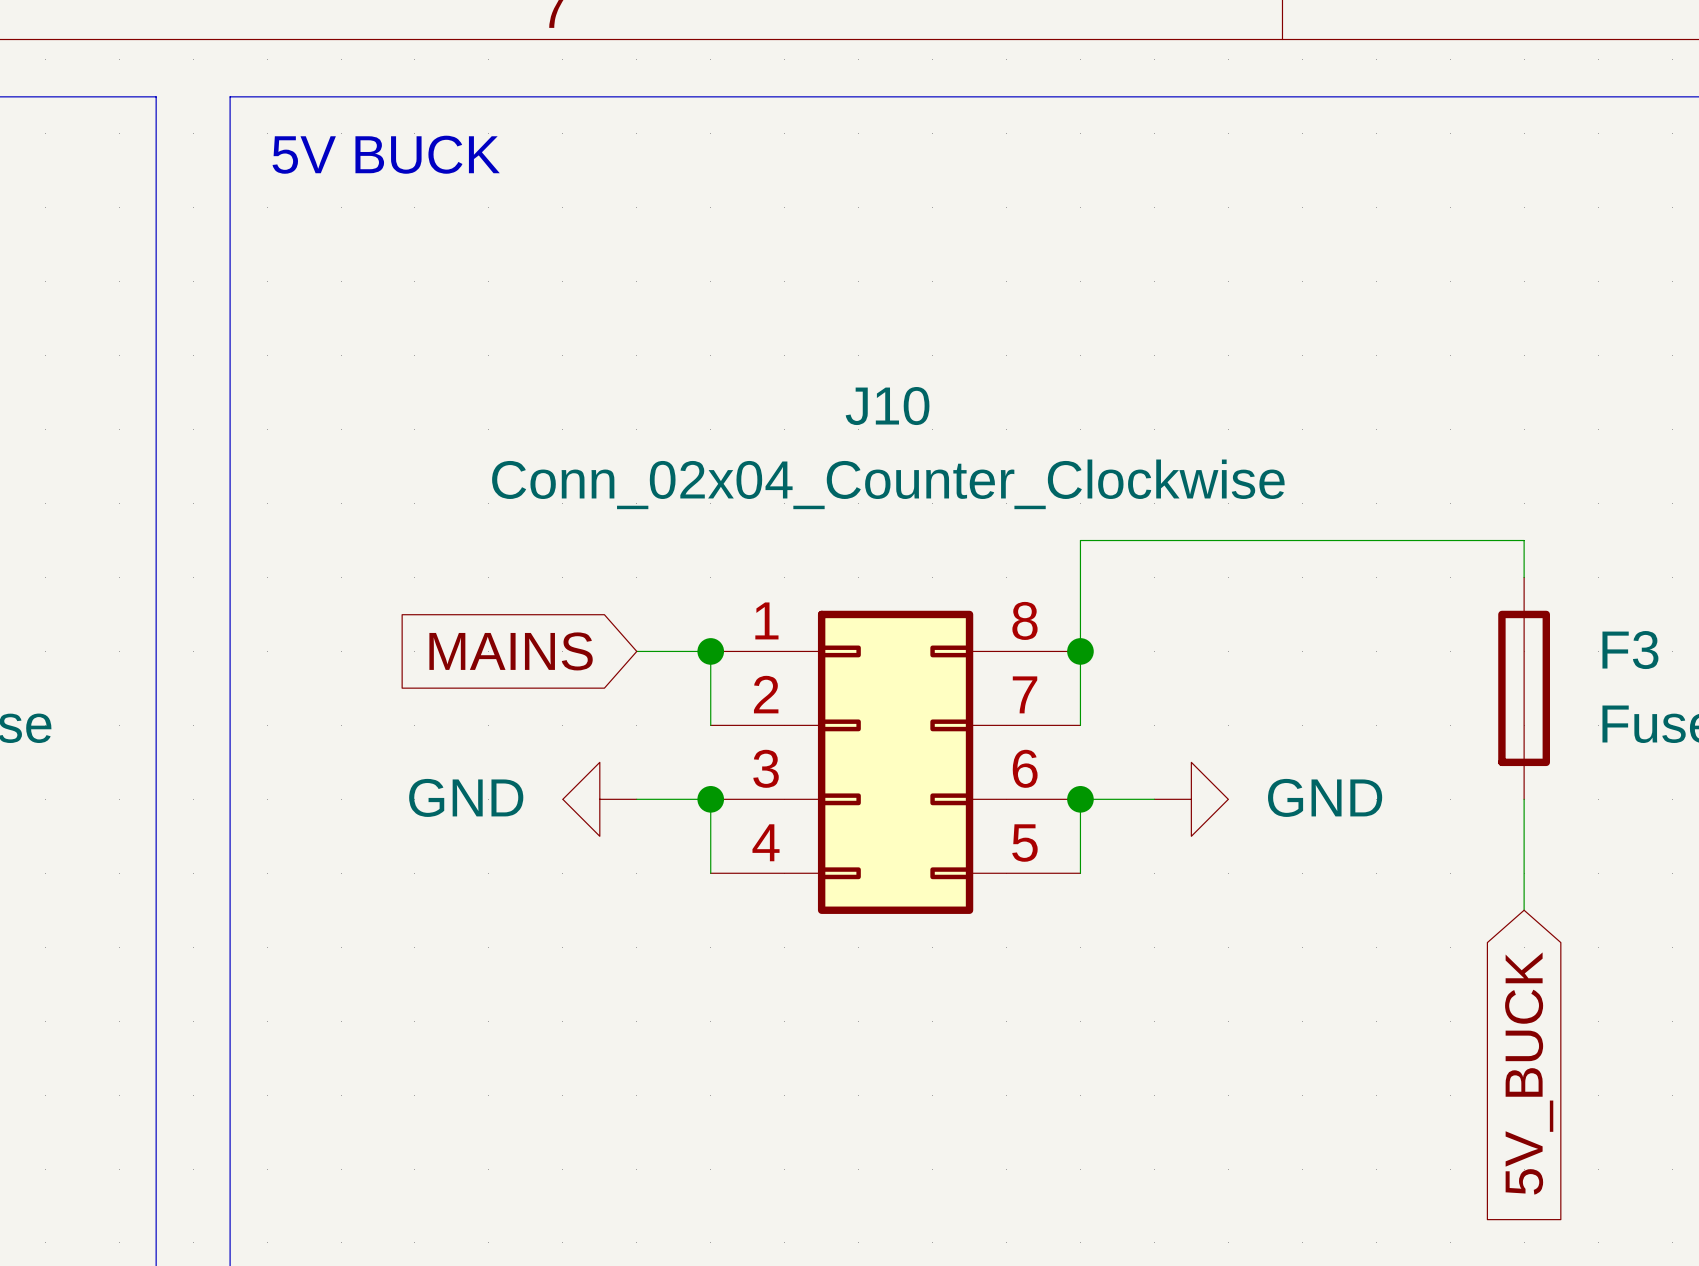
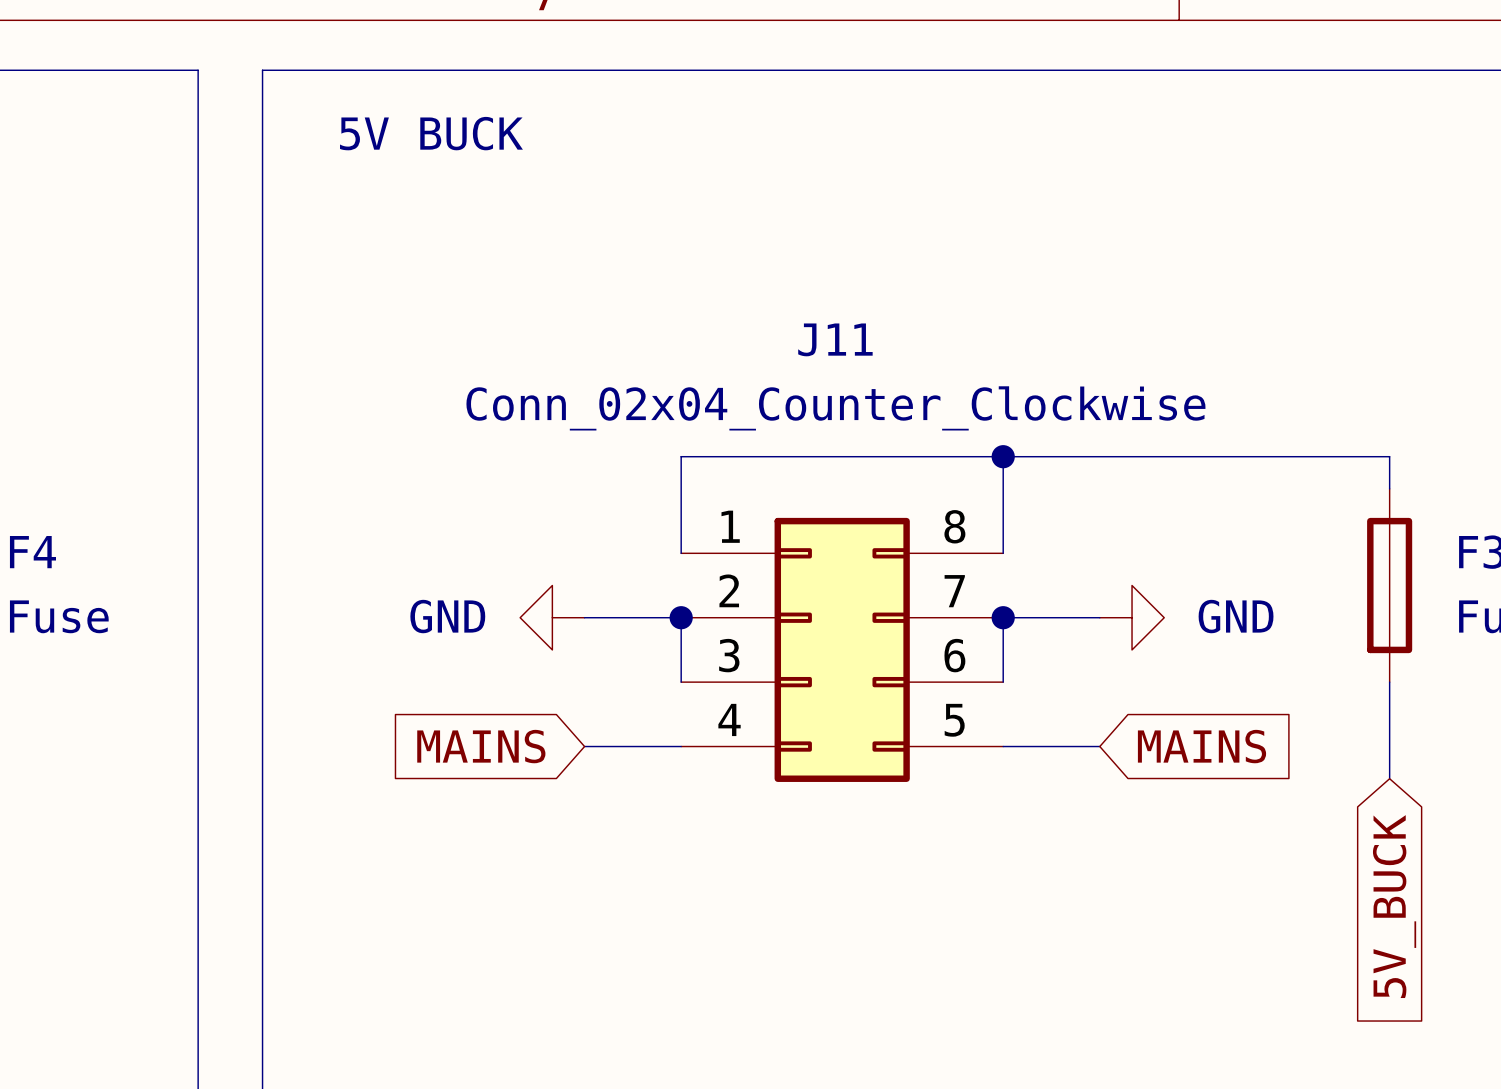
text position: 5V BUCK (386, 154) -> 5V BUCK (431, 133)
J10 name: J10 (887, 406) -> J11 (835, 339)
wire: none -> (1003, 456) (681, 456) (681, 553)
junction: none -> (1003, 456)
global label position: MAINS (511, 651) -> MAINS (481, 746)
wire: (636, 651) (710, 651) (710, 725) -> none
junction: (710, 651) -> none
wire: (1080, 651) (1080, 725) -> none
junction: (1080, 651) -> none
wire: none -> (584, 617) (681, 617) (681, 682)
junction: none -> (681, 617)
junction: none -> (1003, 617)
wire: none -> (1099, 617) (1003, 617) (1003, 682)
power symbol position: GND (599, 799) -> GND (552, 617)
wire: (636, 799) (710, 799) (710, 873) -> (584, 746) (681, 746)
junction: (710, 799) -> none
junction: (1080, 799) -> none
wire: (1154, 799) (1080, 799) (1080, 873) -> (1099, 746) (1003, 746)
power symbol position: GND (1191, 799) -> GND (1132, 617)
global label: none -> MAINS (1202, 746)

